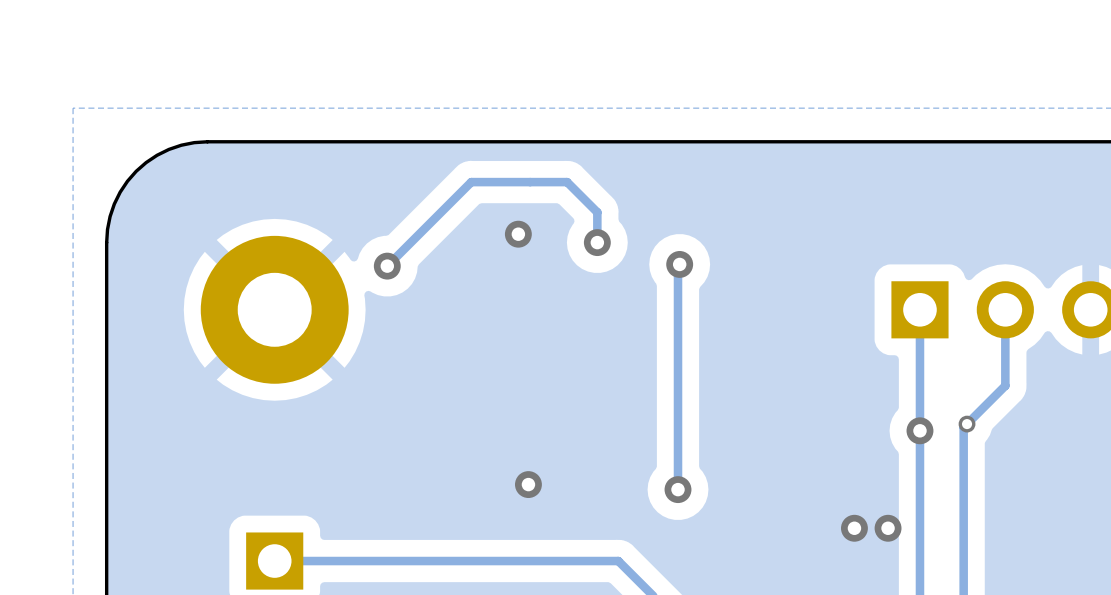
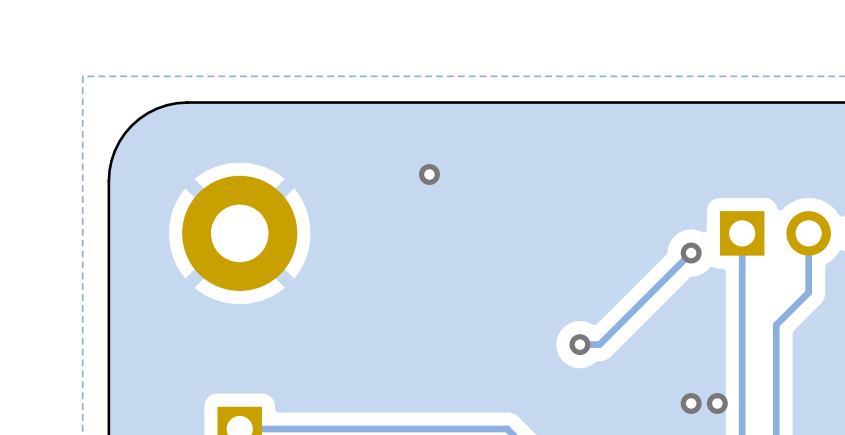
track: (597, 242) (597, 212) (567, 182) (471, 182) (387, 266) -> none
via: (597, 242) -> none
track: (679, 264) (678, 266) (678, 489) -> none
via: (679, 264) -> none
via: (387, 266) -> none
track: none -> (691, 253) (599, 344) (579, 344)
via: none -> (691, 253)
via: (967, 424) -> none
via: (919, 430) -> none
via: (528, 484) -> none
via position: (678, 489) -> (579, 344)

